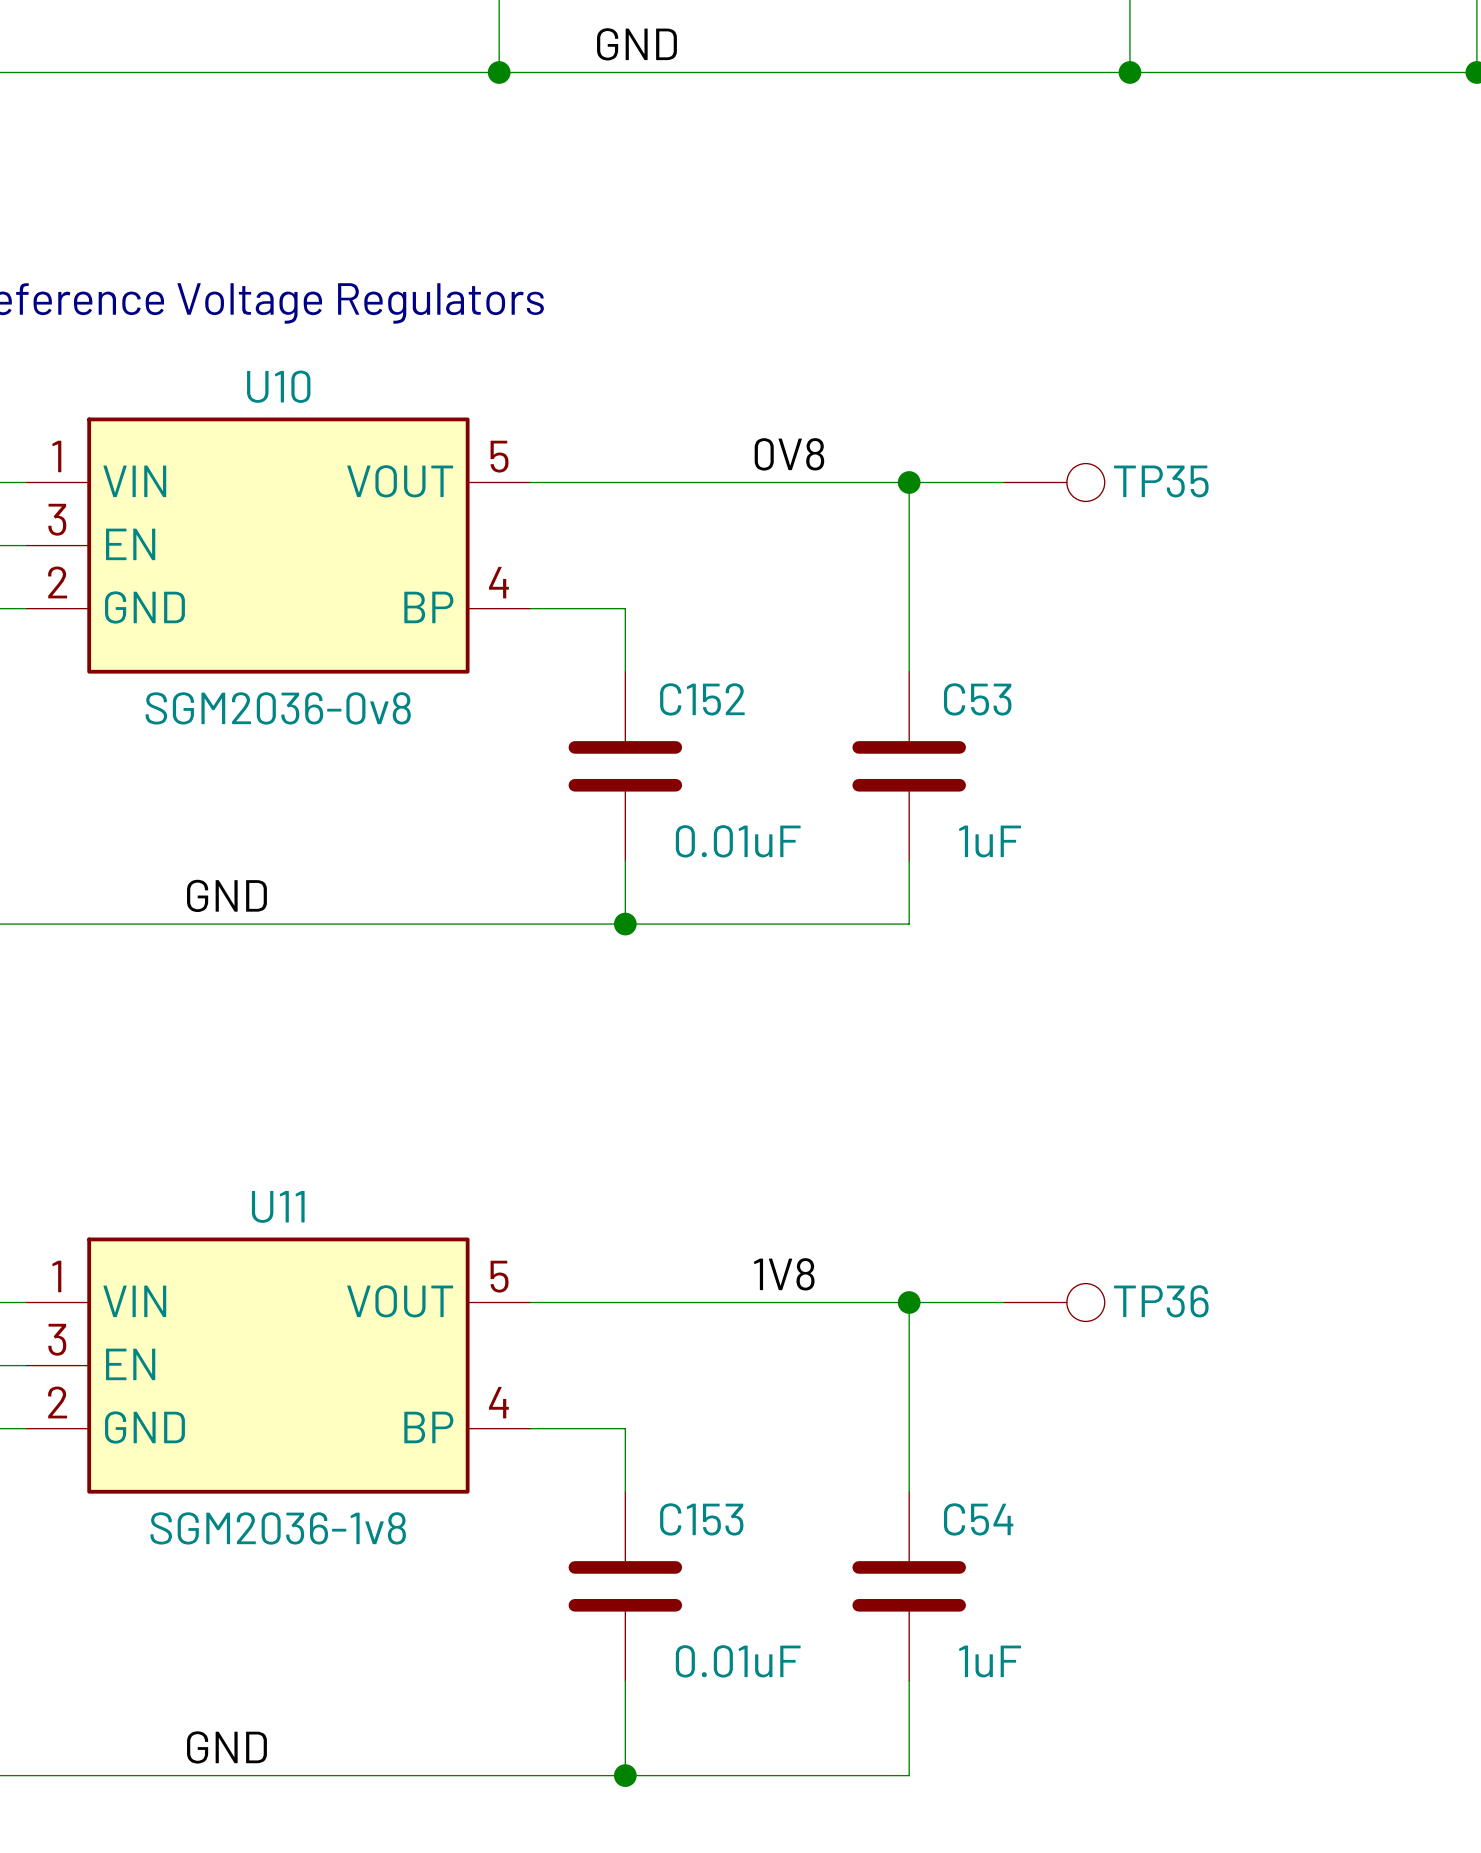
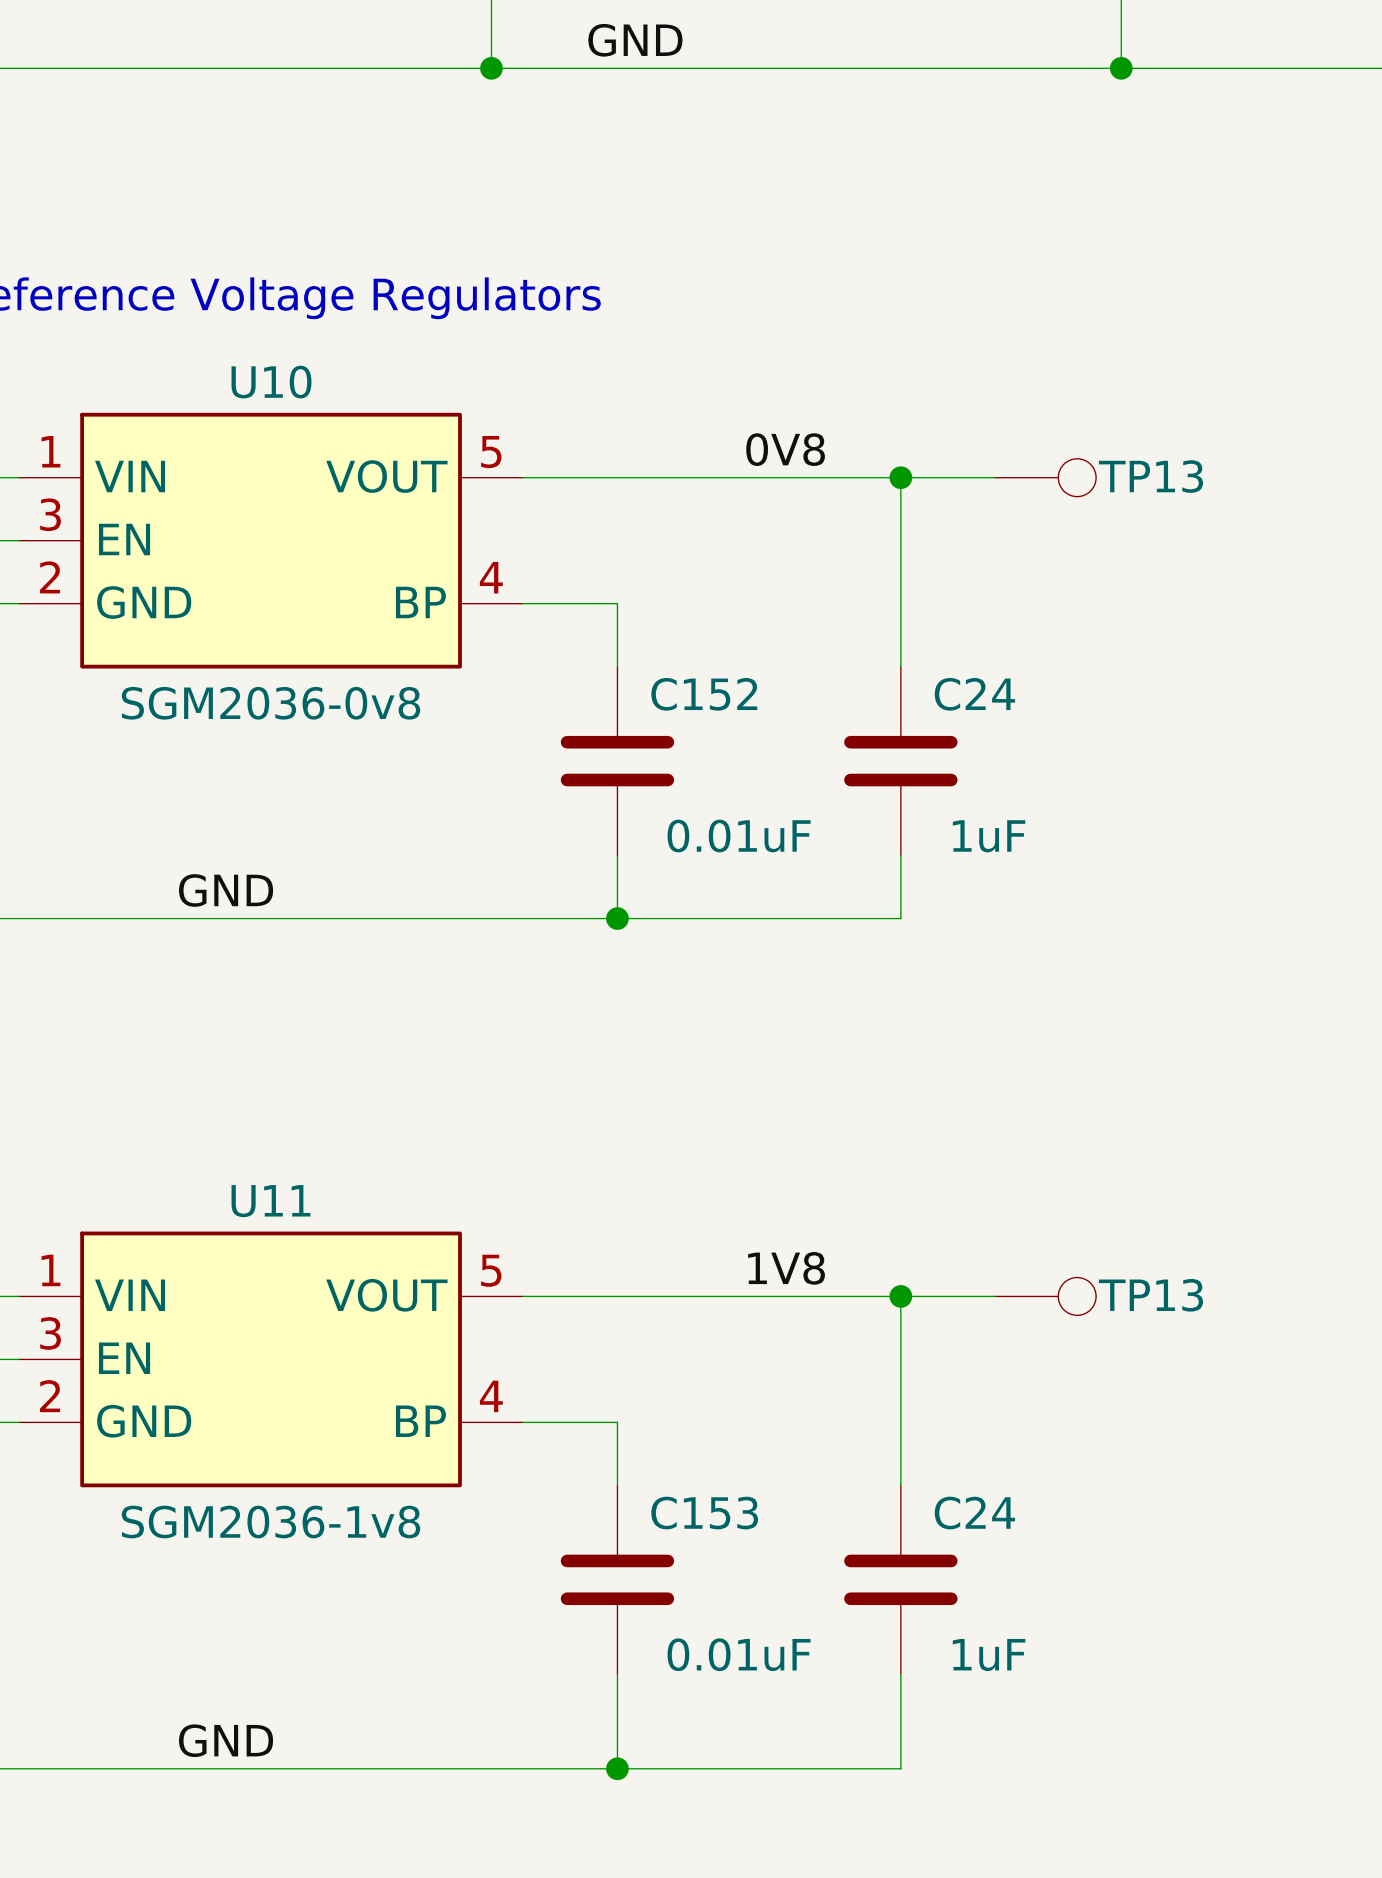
TP35 name: TP35 (1161, 481) -> TP13 (1150, 476)
C53 name: C53 (977, 699) -> C24 (974, 694)
TP36 name: TP36 (1161, 1301) -> TP13 (1150, 1295)
C54 name: C54 (978, 1519) -> C24 (974, 1513)

